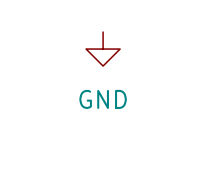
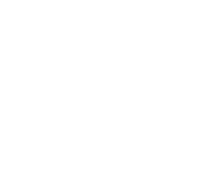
power symbol: GND (103, 49) -> none

